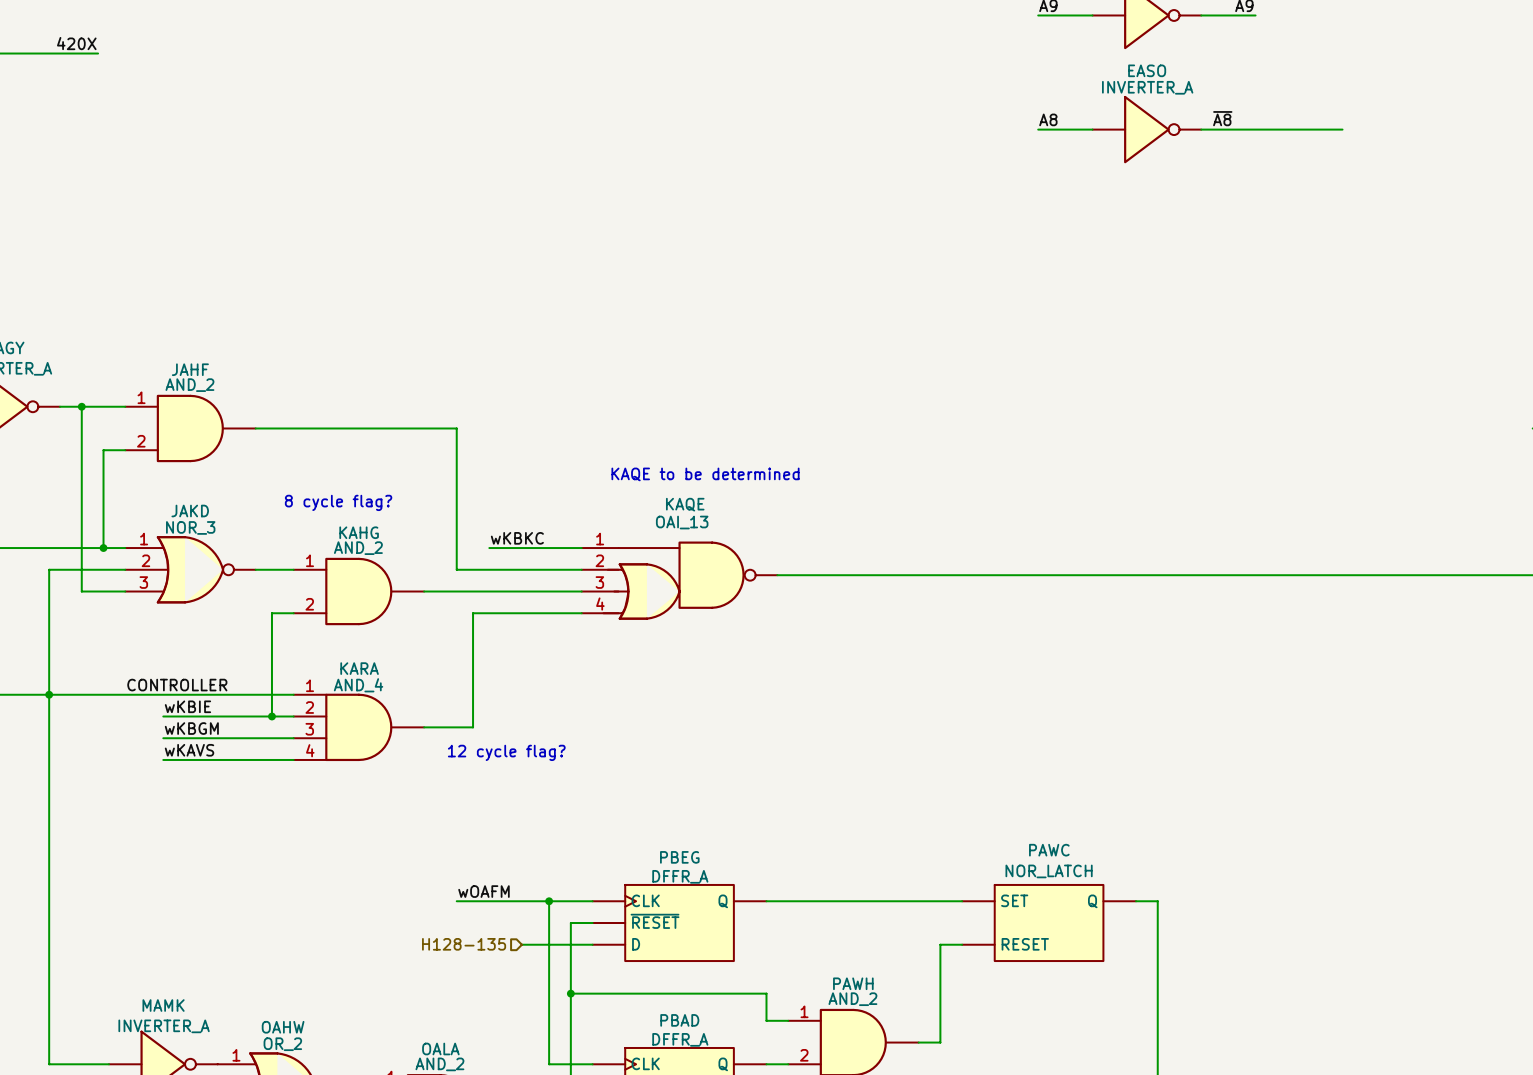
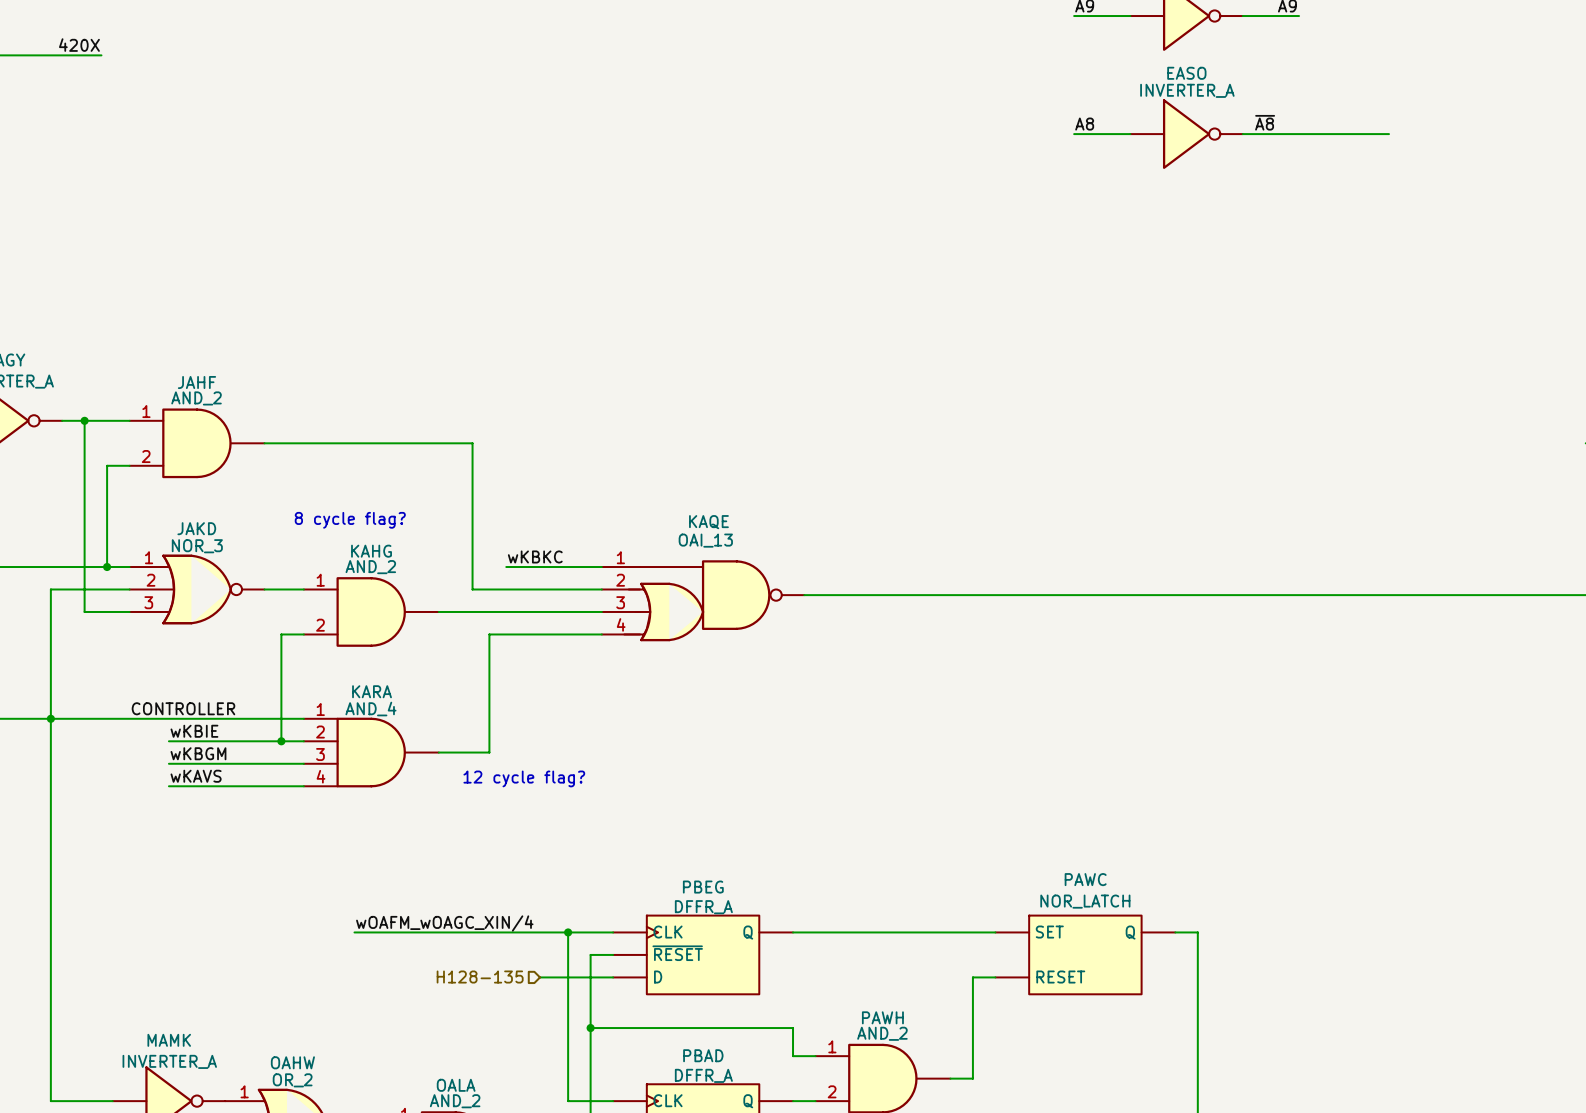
text: KAQE to be determined (705, 474) -> none
label: wOAFM (483, 891) -> none
label: none -> wOAFM_wOAGC_XIN/4 (444, 923)
wire: none -> (354, 932) (472, 932)

